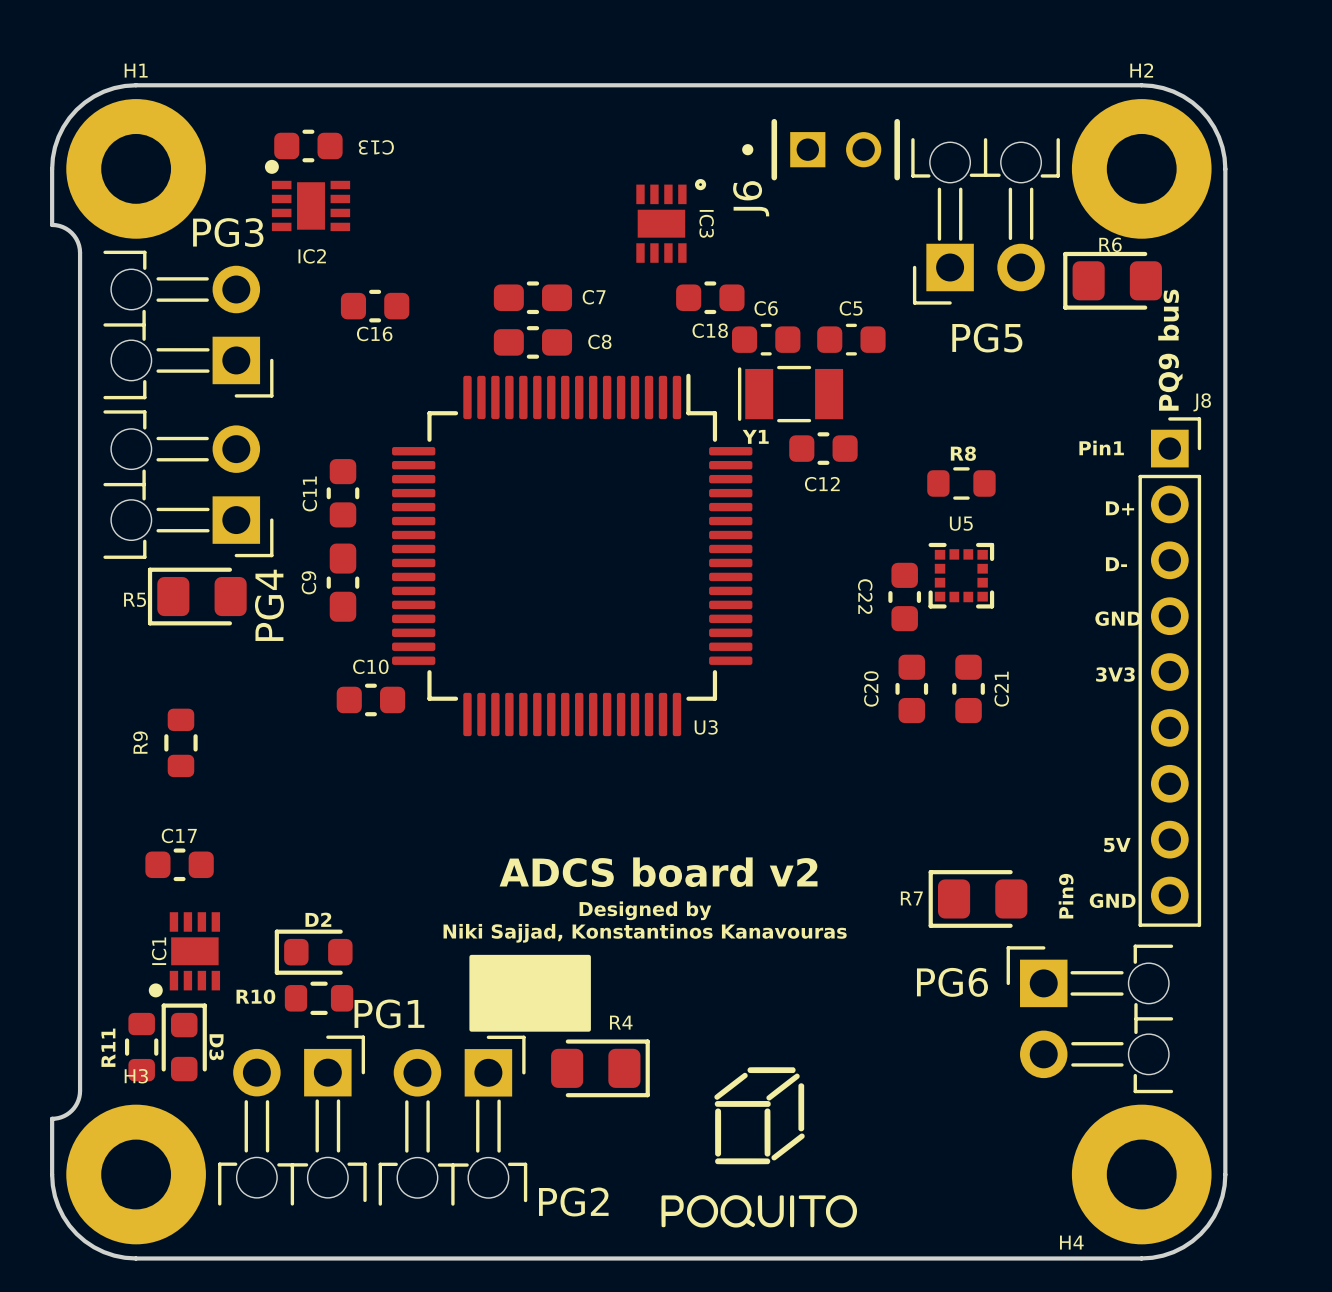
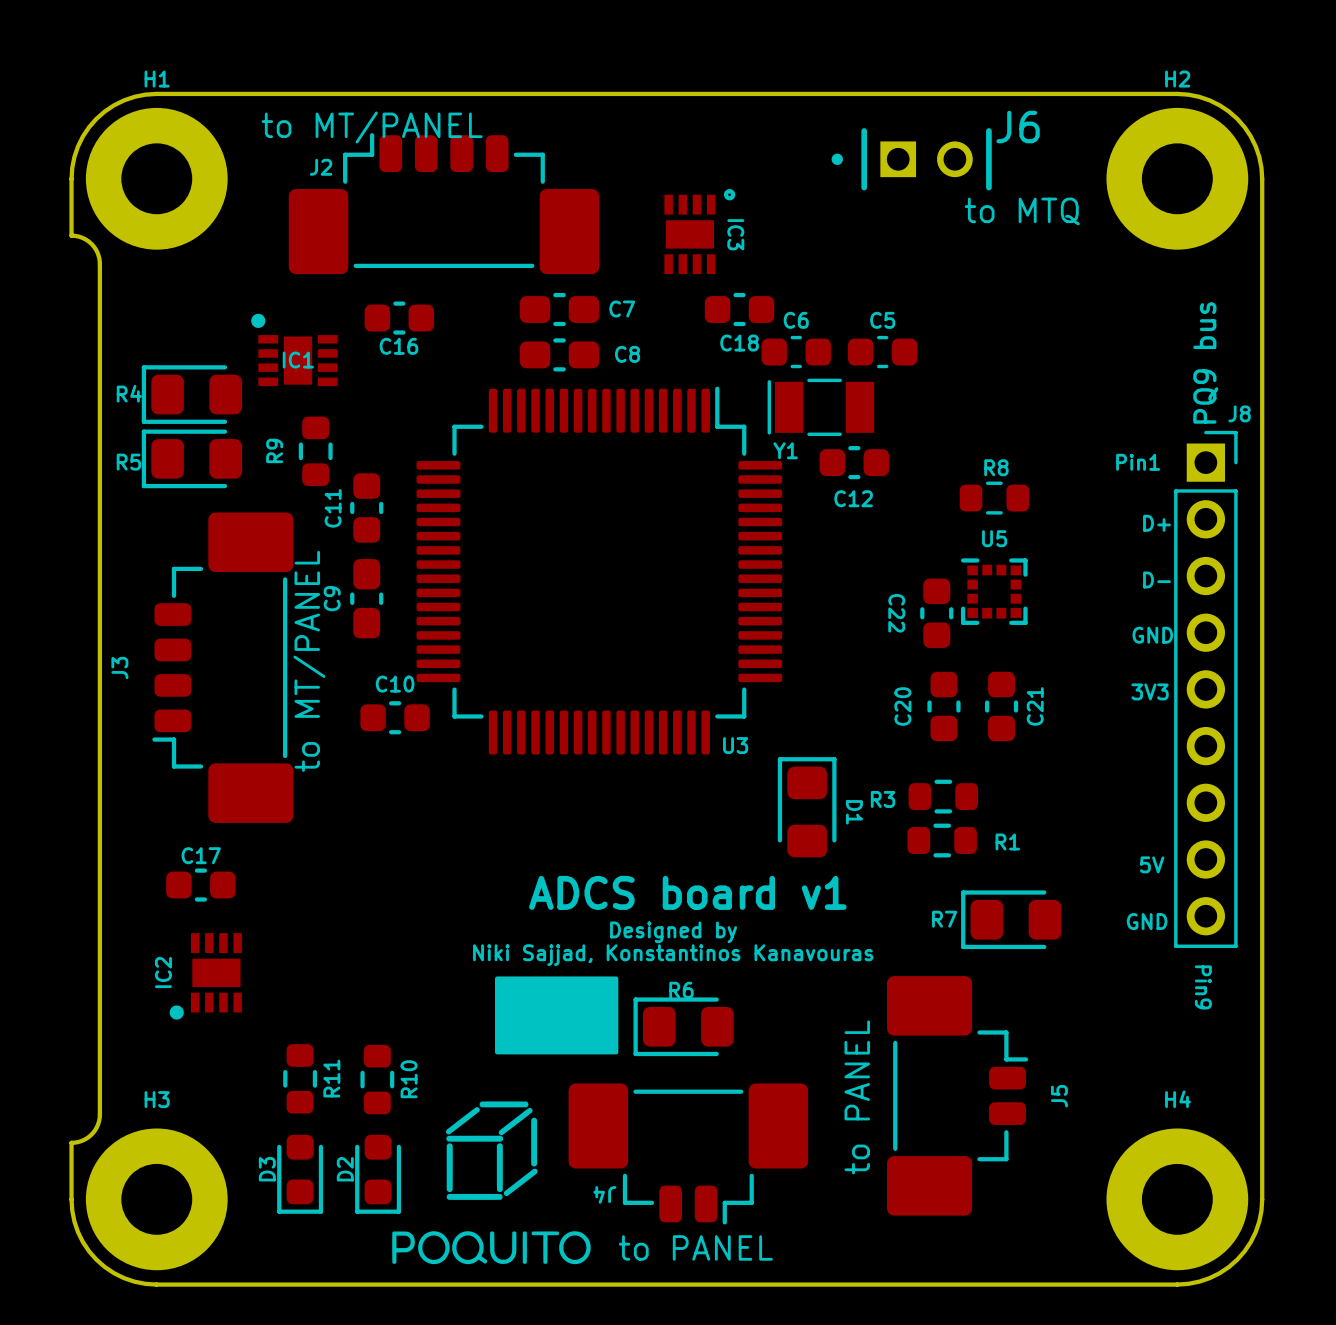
text: none -> to MT/PANEL (372, 127)
C13: (308, 145) -> none
J6 position: (821, 149) -> (911, 159)
J2: none -> (443, 203)
IC2: (307, 195) -> none
J6 name rotation: 0° (751, 198) -> 90° clockwise (1018, 127)
J6 name position: J6 (751, 198) -> J6 (1018, 127)
text: none -> to MTQ (1022, 211)
PG5: (985, 221) -> none
R6 position: (1112, 280) -> (683, 1026)
PG3: (188, 324) -> none
IC1: none -> (294, 349)
PG4: (188, 484) -> none
R5 position: (197, 596) -> (191, 458)
text: none -> to MT/PANEL (309, 661)
J3: none -> (222, 667)
R9 position: (180, 742) -> (315, 451)
R1: none -> (943, 796)
D1: none -> (807, 807)
R3: none -> (942, 840)
text: ADCS board v2 (658, 872) -> ADCS board v1 (687, 892)
text rotation: 0° (1066, 896) -> 180° (1203, 987)
text position: Pin9 (1066, 896) -> Pin9 (1203, 987)
IC1 name: IC1 (159, 951) -> IC2 (163, 972)
D2 rotation: 0° (313, 952) -> 90° counterclockwise (378, 1174)
D2 position: (313, 952) -> (378, 1174)
R10 name position: R10 (255, 996) -> R10 (409, 1079)
R10 rotation: 0° (319, 998) -> 90° clockwise (377, 1079)
R10 position: (319, 998) -> (377, 1079)
PG6: (1089, 1018) -> none
R4 name position: R4 (621, 1022) -> R4 (129, 393)
D3 rotation: 0° (184, 1042) -> 180° (300, 1174)
D3 position: (184, 1042) -> (300, 1174)
R11 name position: R11 (108, 1047) -> R11 (331, 1078)
R11 position: (141, 1047) -> (300, 1078)
R4 rotation: 0° (600, 1068) -> 180° (191, 394)
R4 position: (600, 1068) -> (191, 394)
J5: none -> (957, 1095)
text: none -> to PANEL (857, 1097)
PG1: (292, 1120) -> none
PG2: (452, 1120) -> none
J4: none -> (688, 1153)
drawing position: (759, 1147) -> (491, 1182)
text: none -> to PANEL (695, 1247)
H4 name position: H4 (1071, 1242) -> H4 (1178, 1099)

